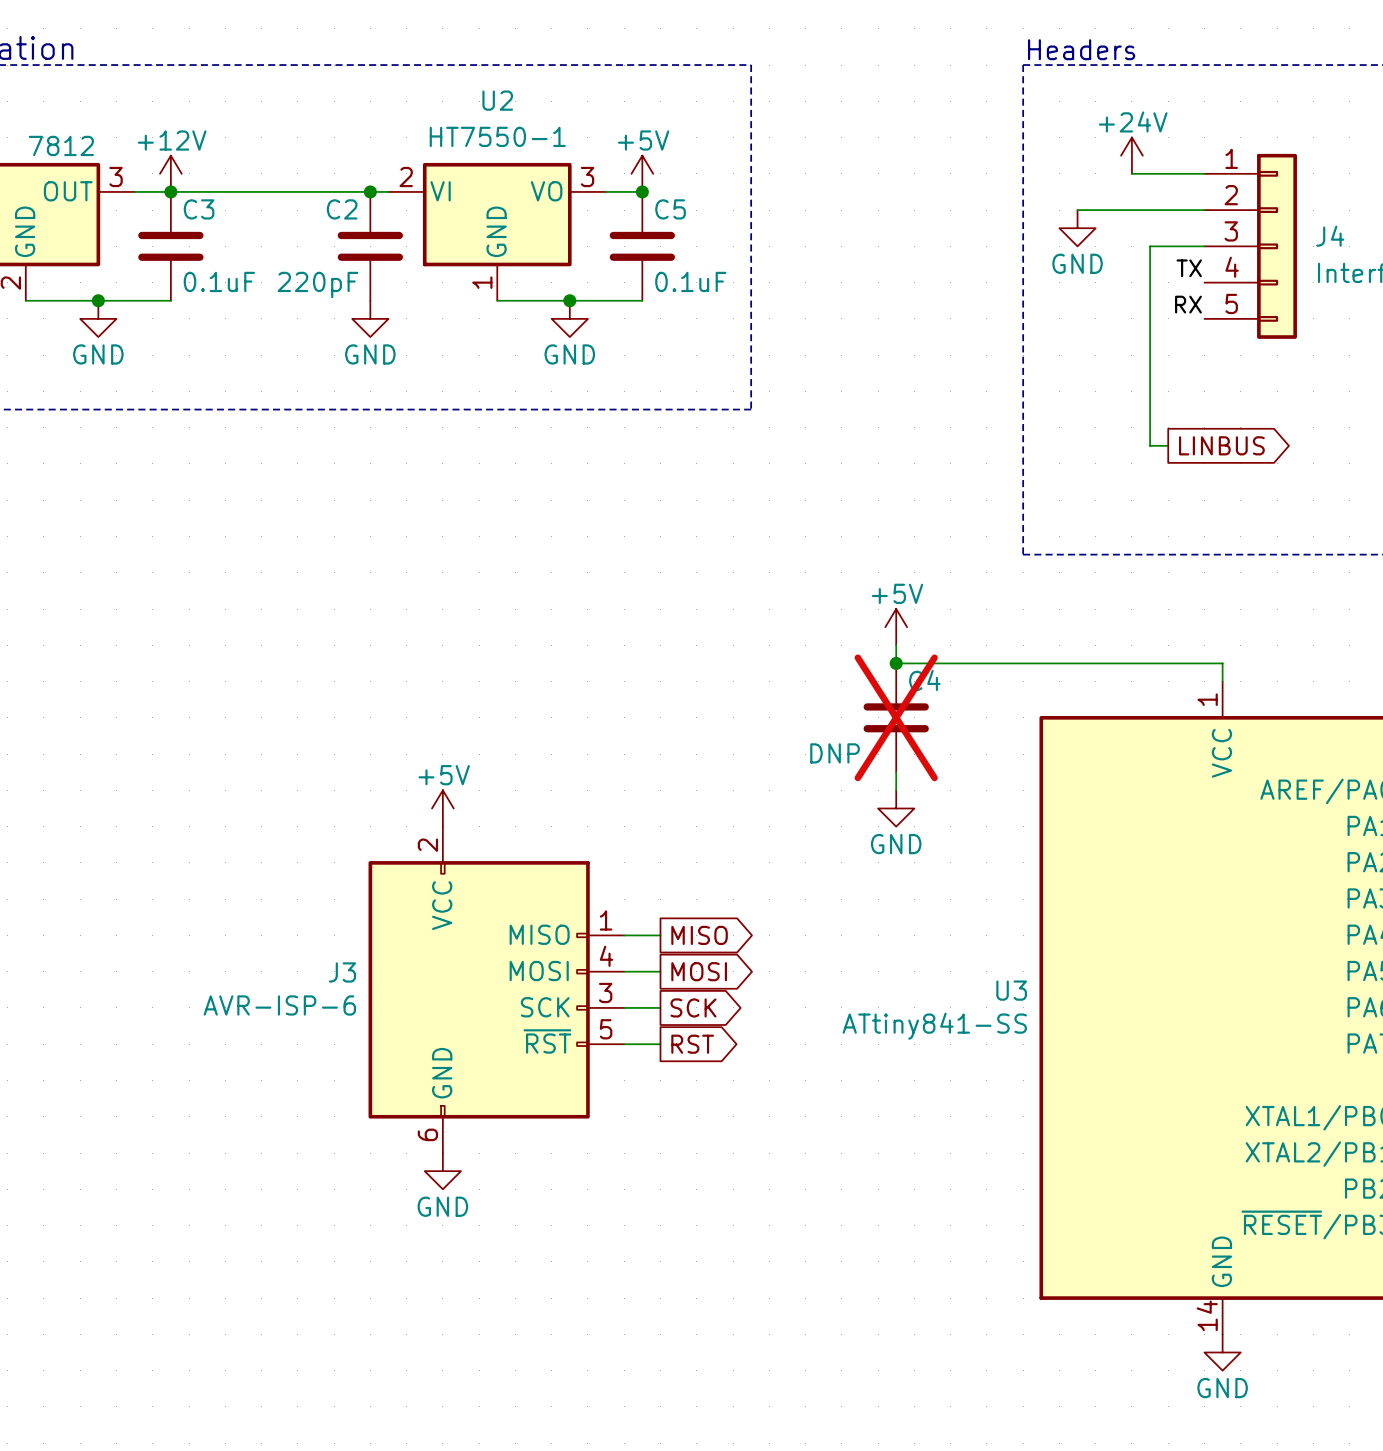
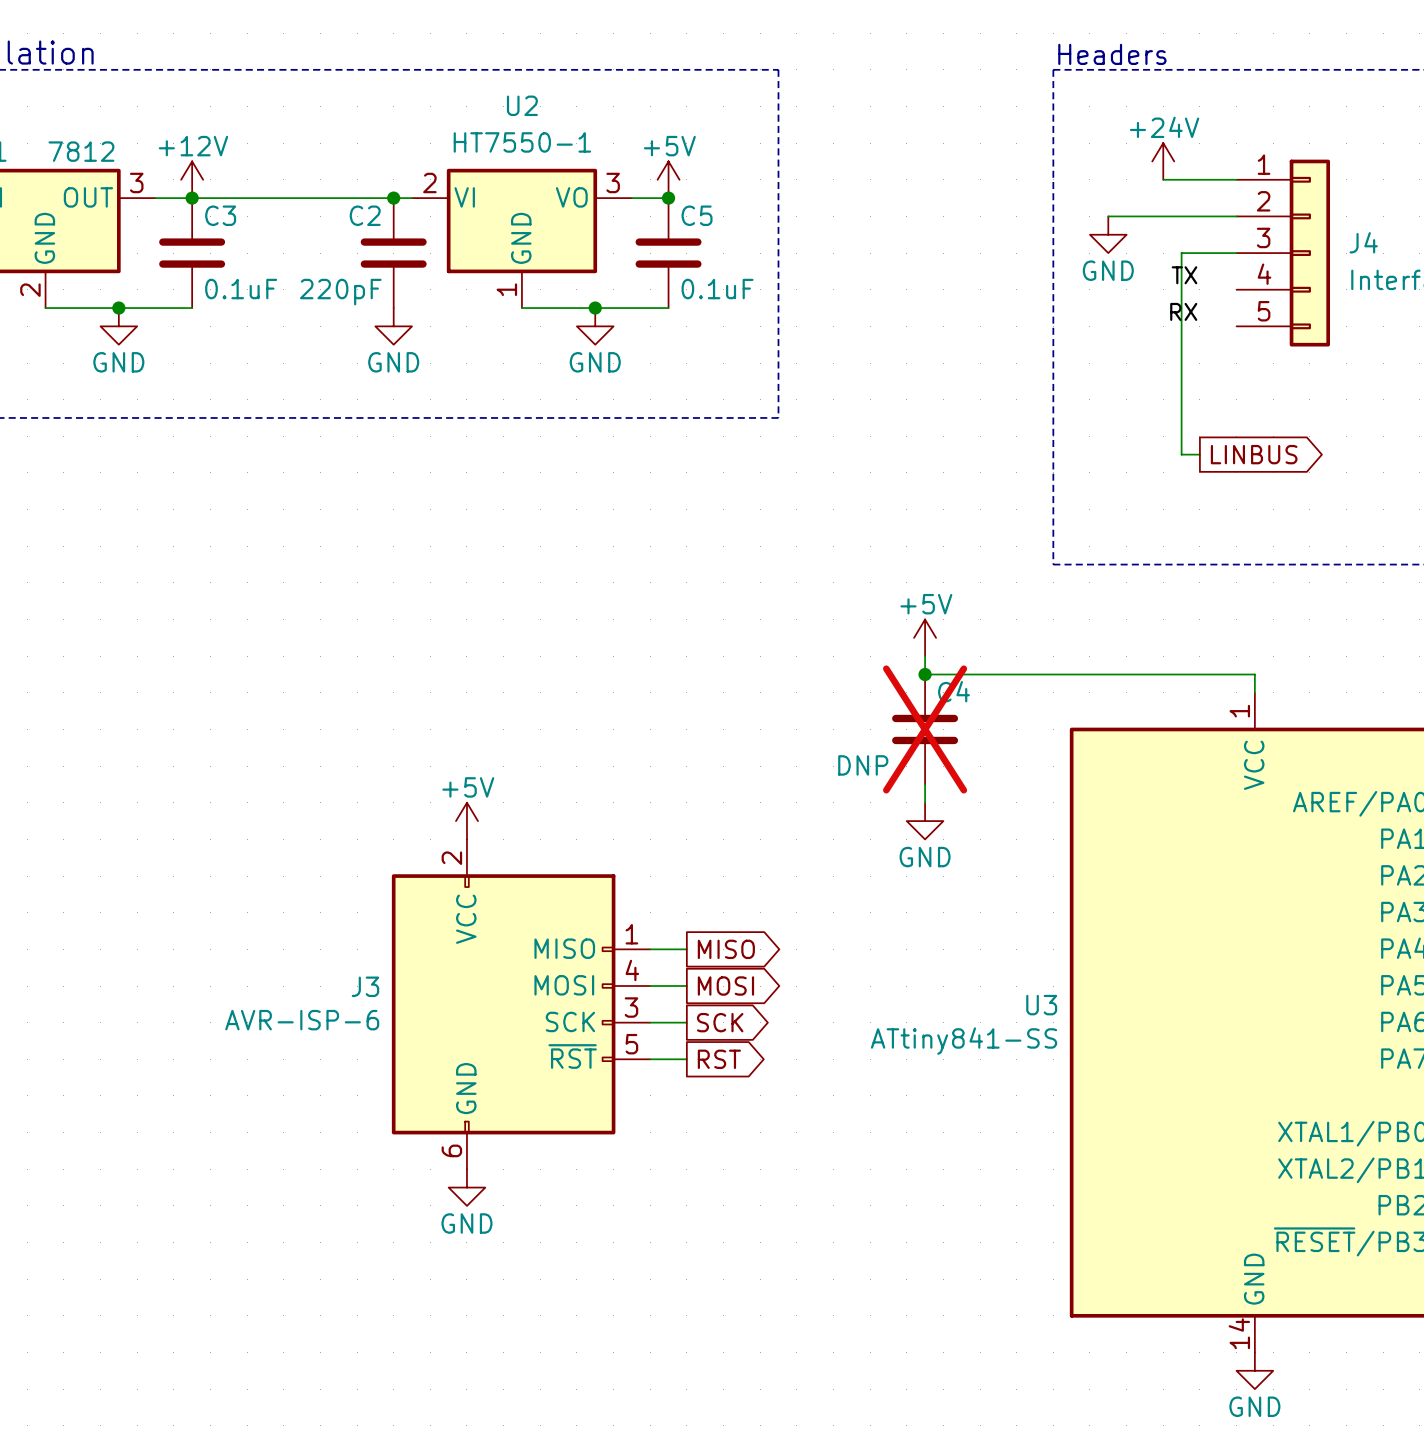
label position: TX (1189, 268) -> TX (1184, 275)
label position: RX (1188, 304) -> RX (1183, 311)

